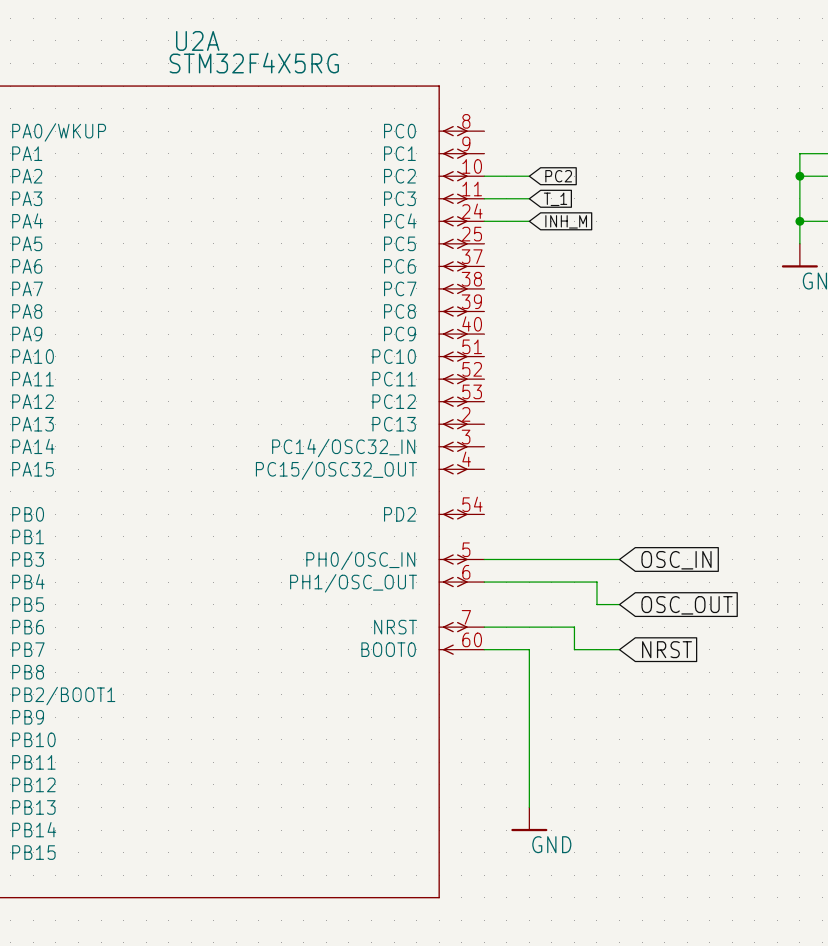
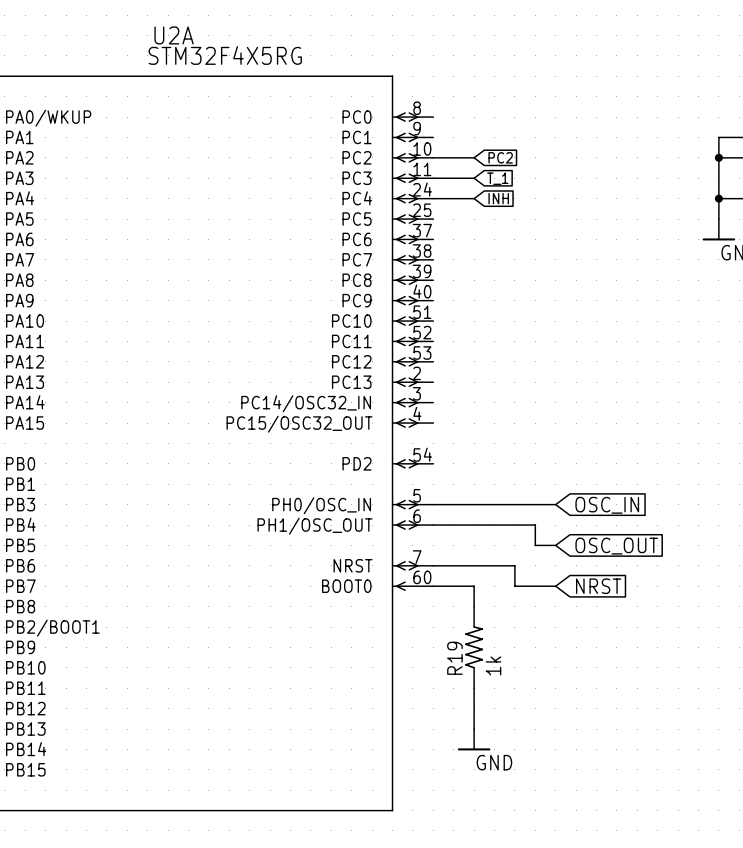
global label: INH_M (566, 221) -> INH (498, 198)
R19: none -> 1k (474, 647)

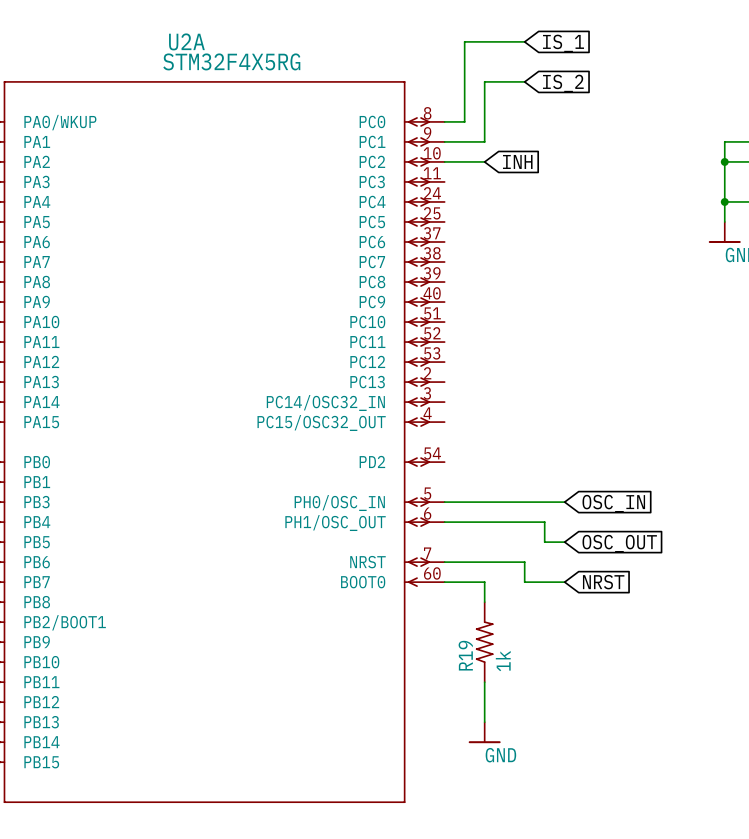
wire: none -> (524, 41) (464, 41) (464, 121) (444, 121)
global label: none -> IS_1 (563, 43)
wire: none -> (524, 81) (484, 81) (484, 141) (444, 141)
global label: none -> IS_2 (563, 83)
global label: PC2 (500, 157) -> INH (517, 161)
wire: (433, 178) (474, 178) -> none
global label: T_1 (497, 178) -> none
wire: (433, 198) (474, 198) -> none
global label: INH (498, 198) -> none

